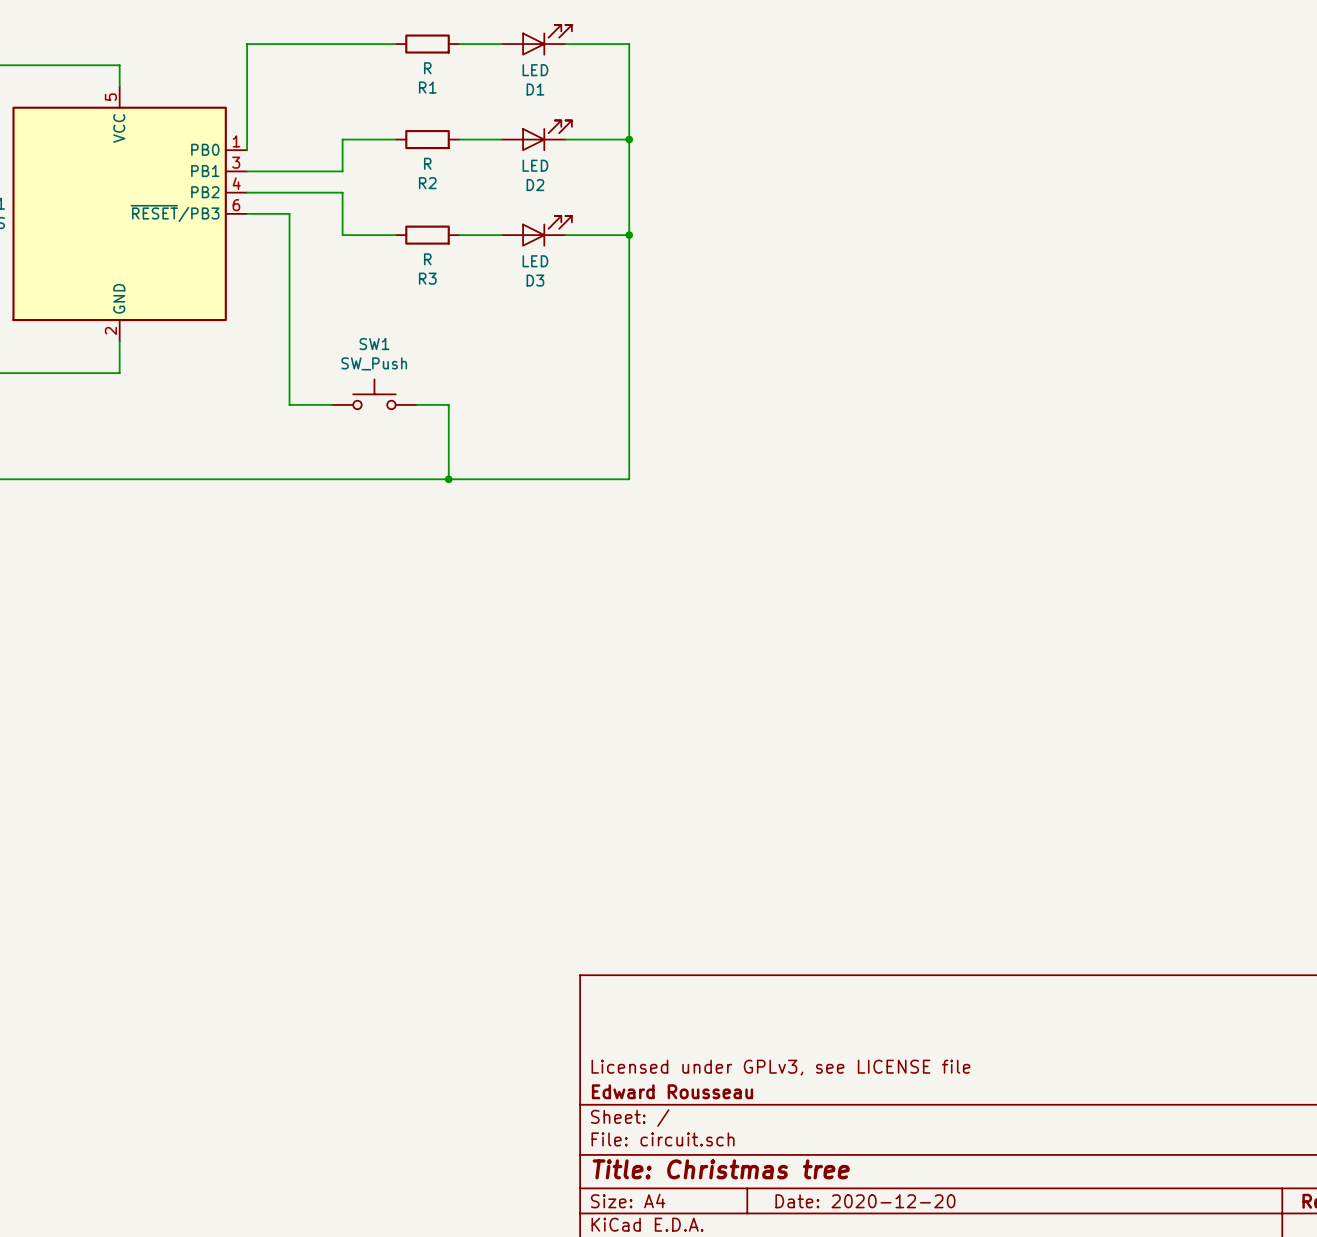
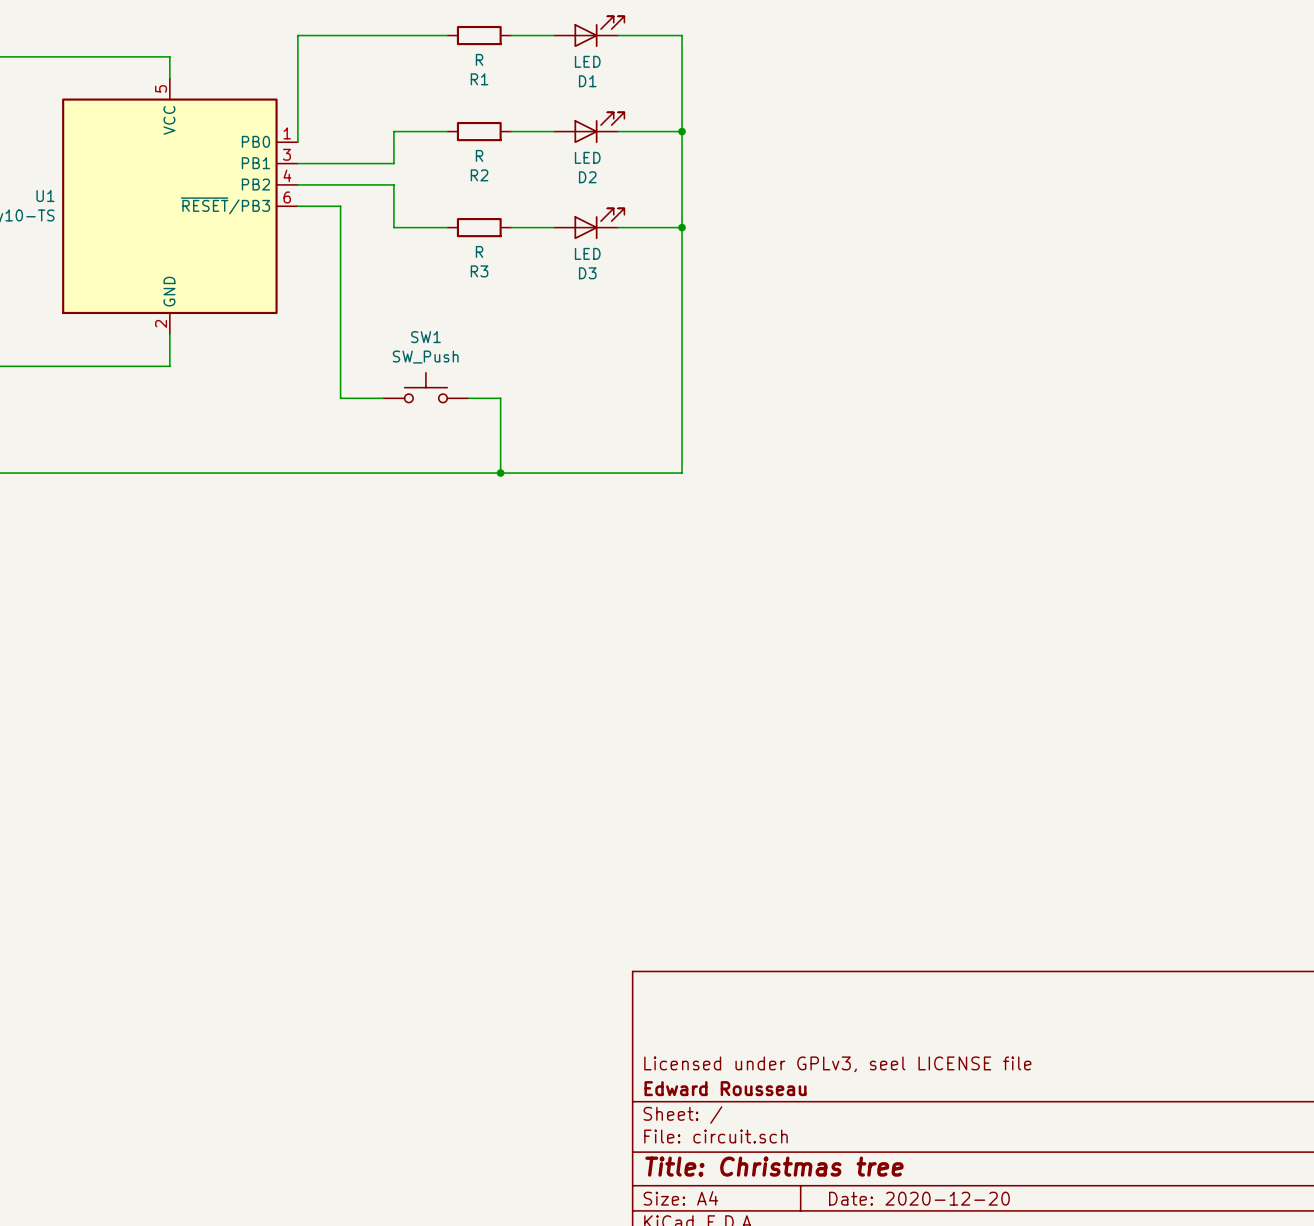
title block: Licensed under GPLv3, see LICENSE file (780, 1067) -> Licensed under GPLv3, seel LICENSE file (837, 1064)

